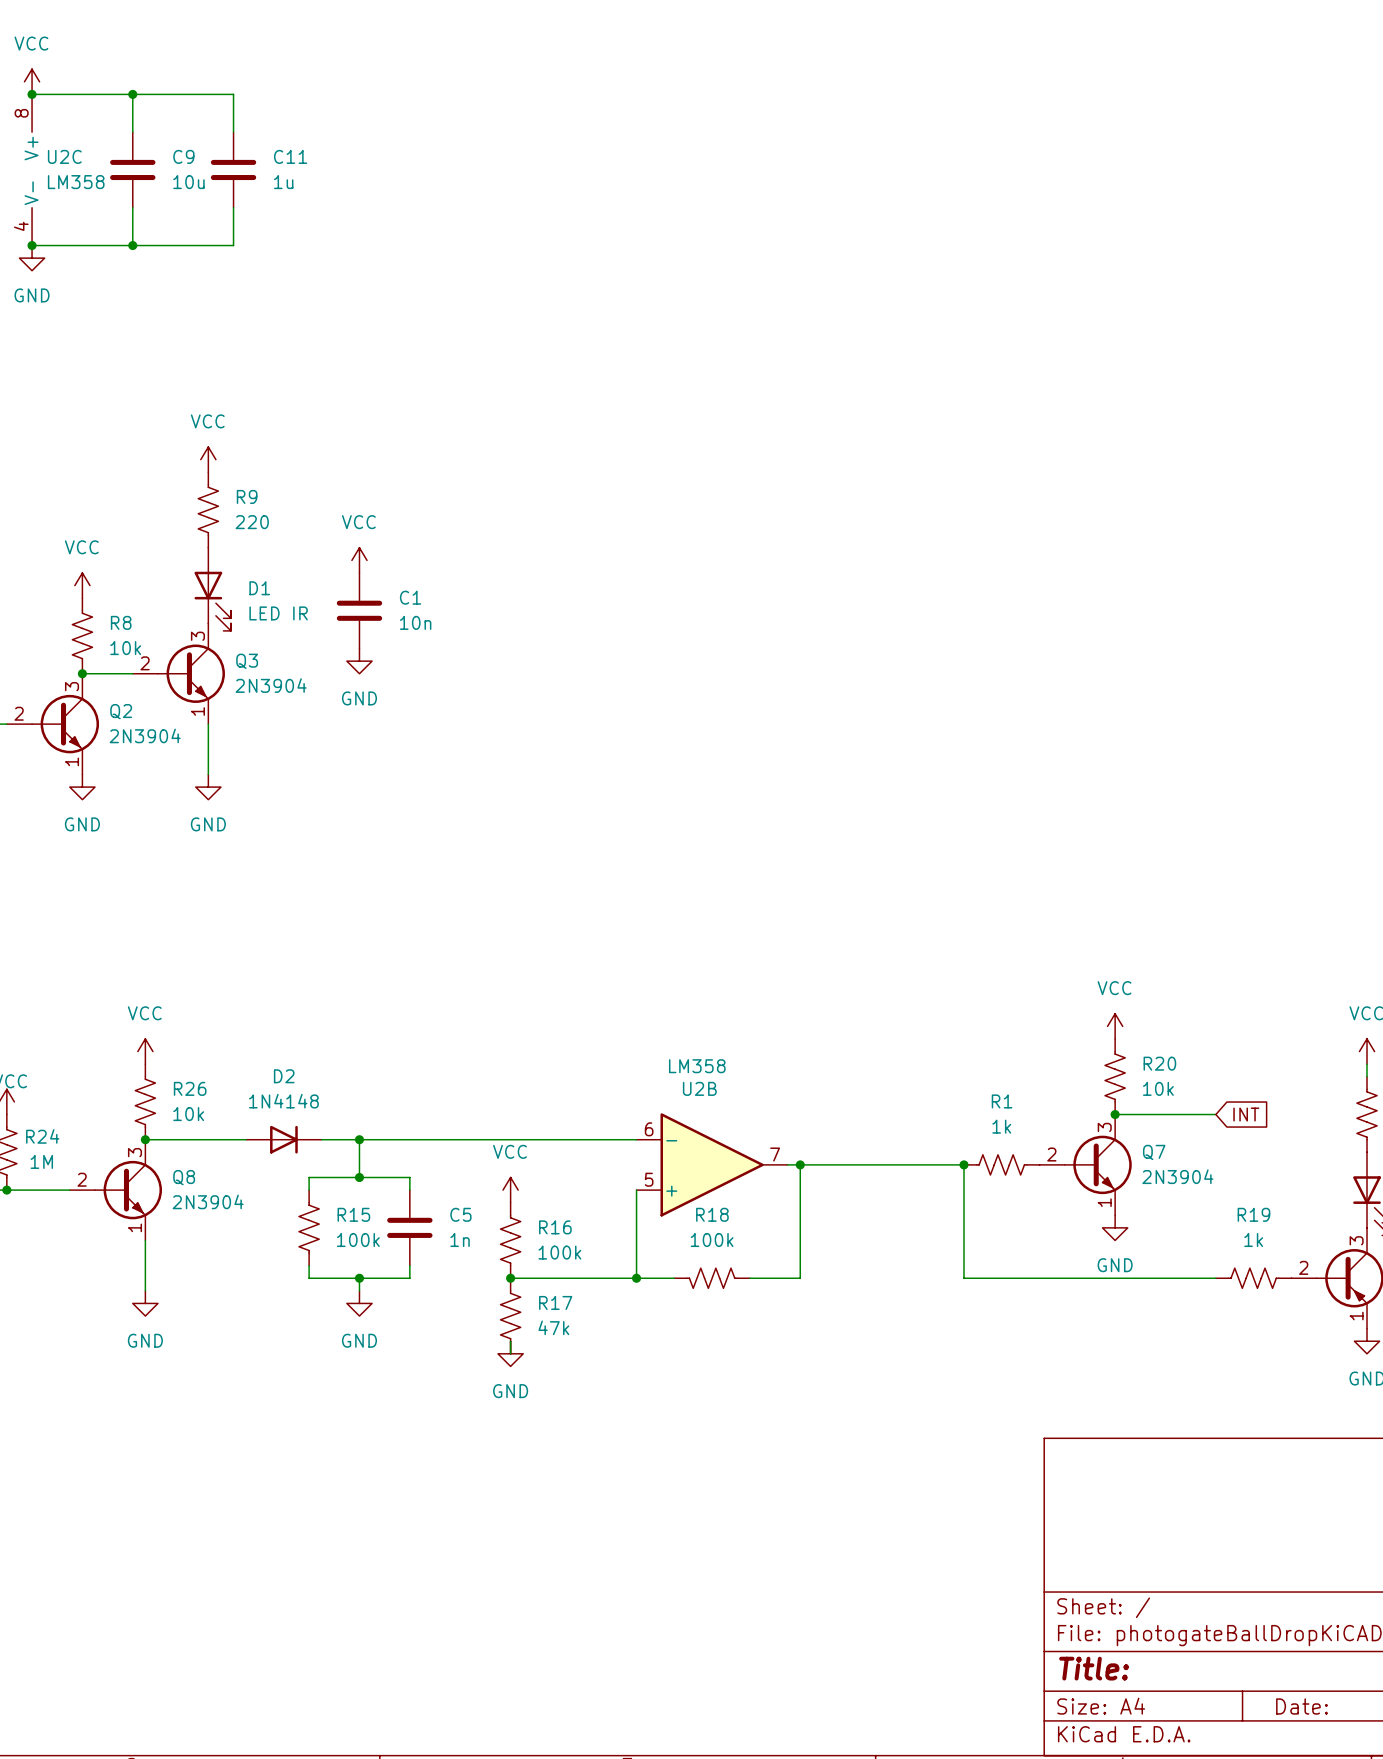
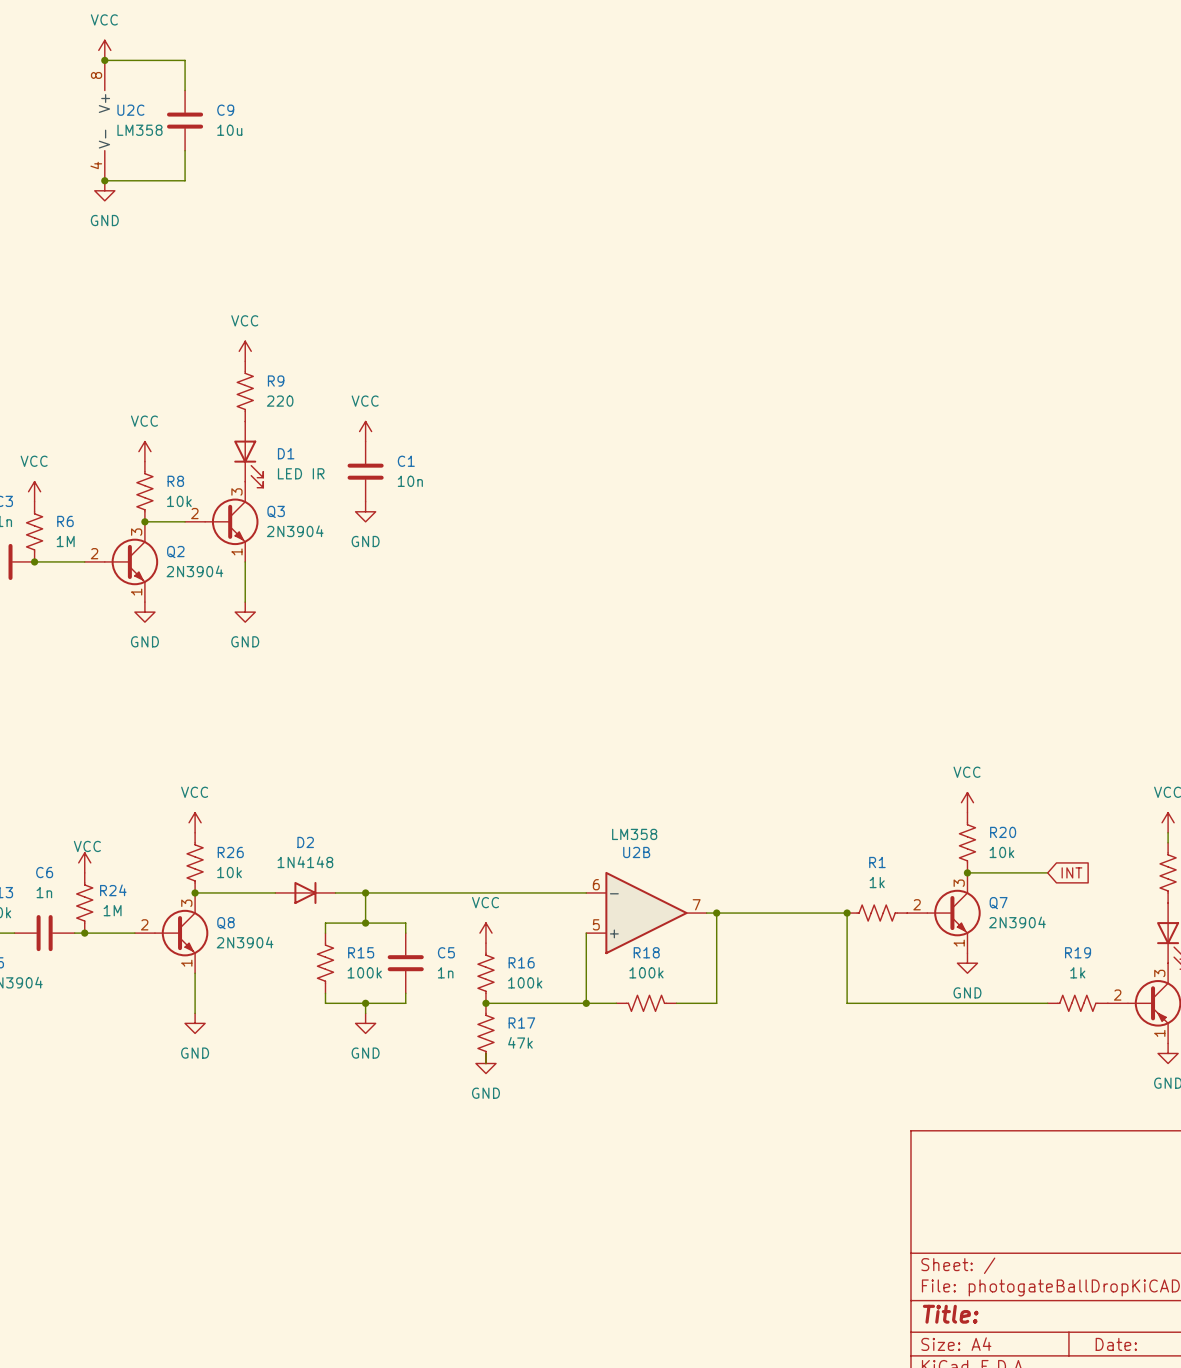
wire: (132, 94) (233, 94) (233, 132) -> none
junction: (132, 94) -> none
C11: 1u (233, 169) -> none
wire: (233, 207) (233, 245) (132, 245) -> none
junction: (132, 245) -> none

